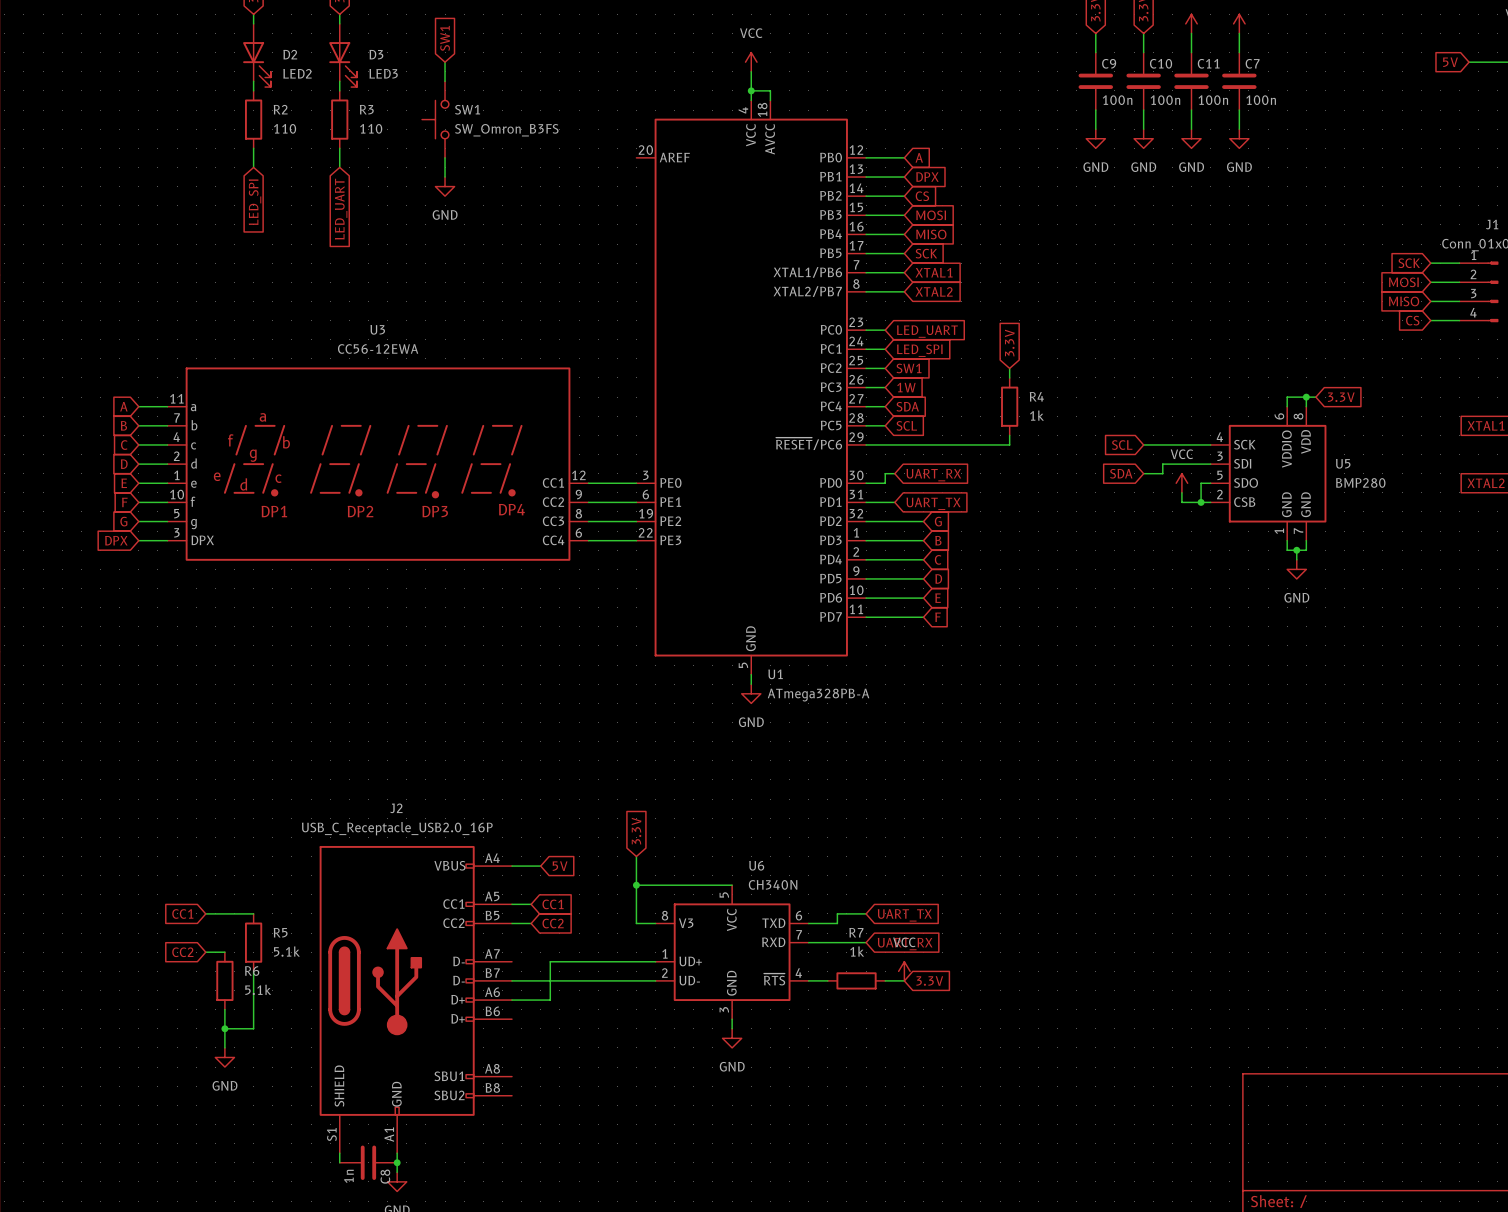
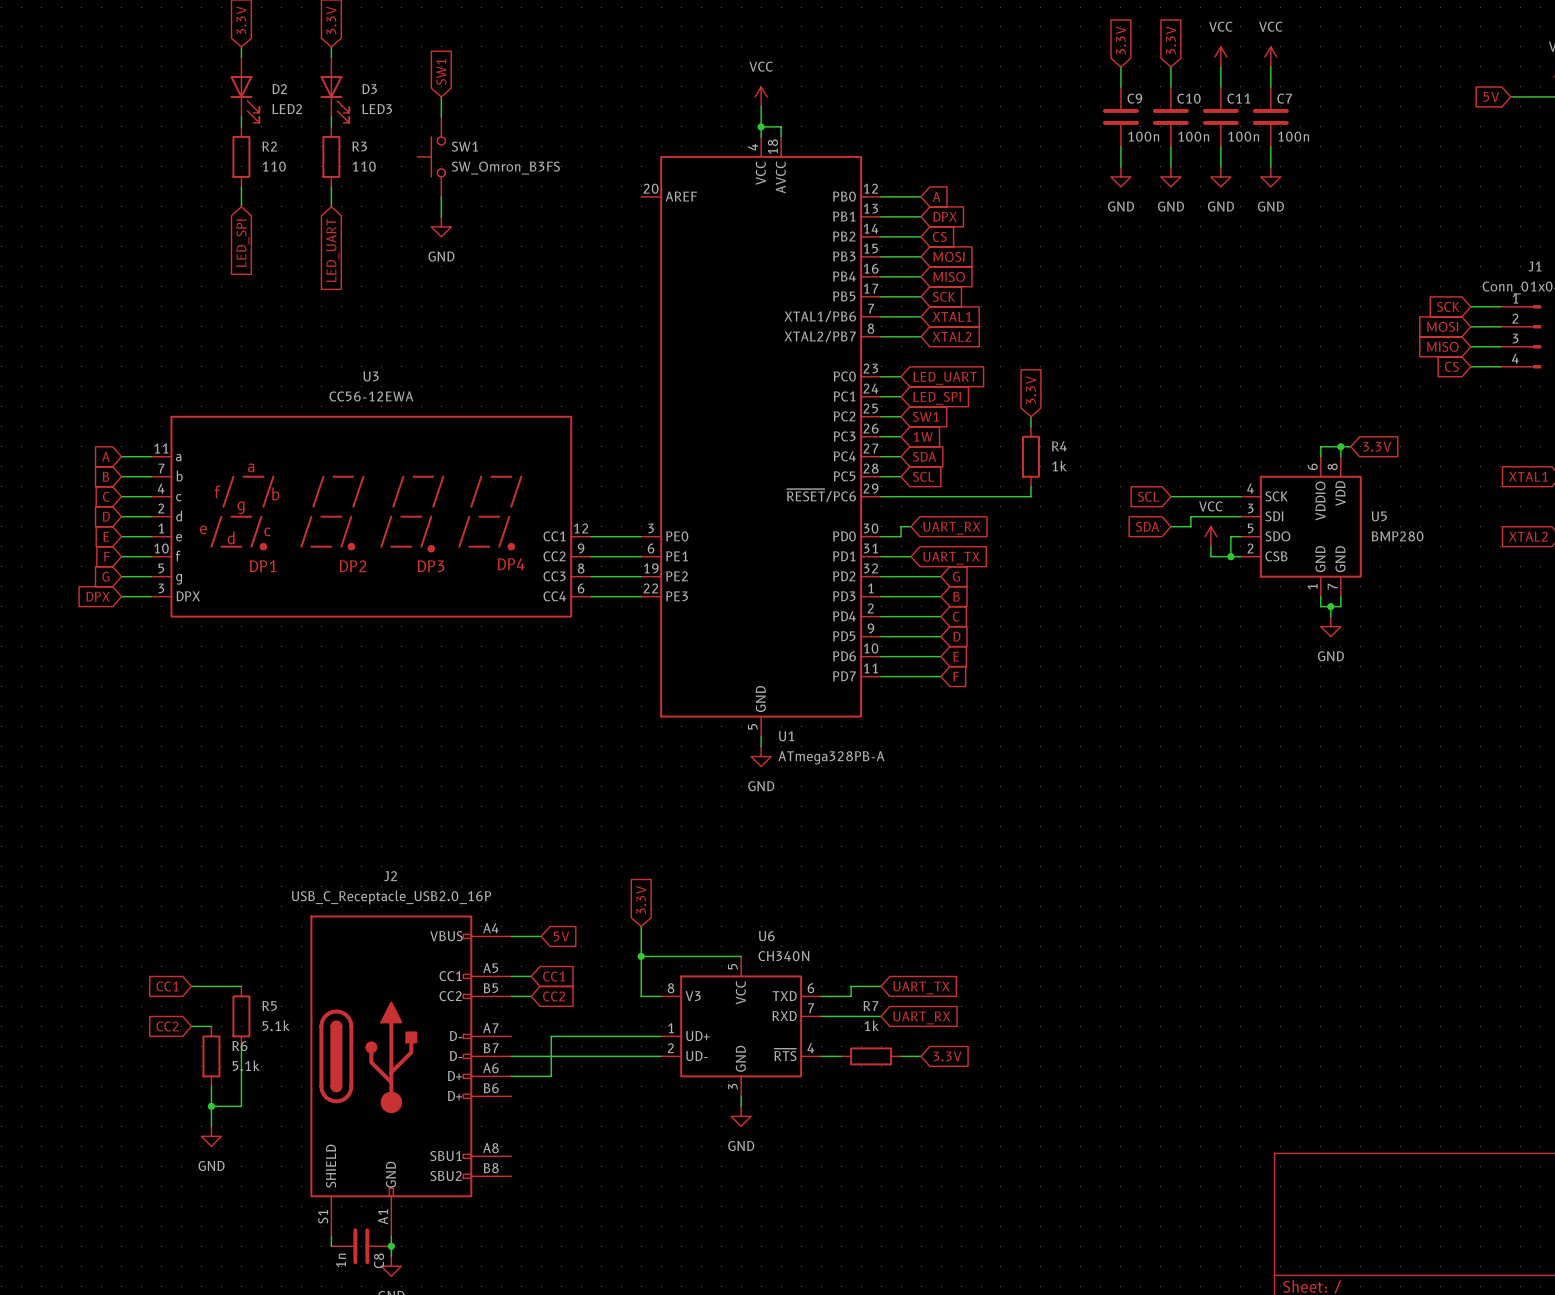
power symbol: VCC (904, 971) -> none

